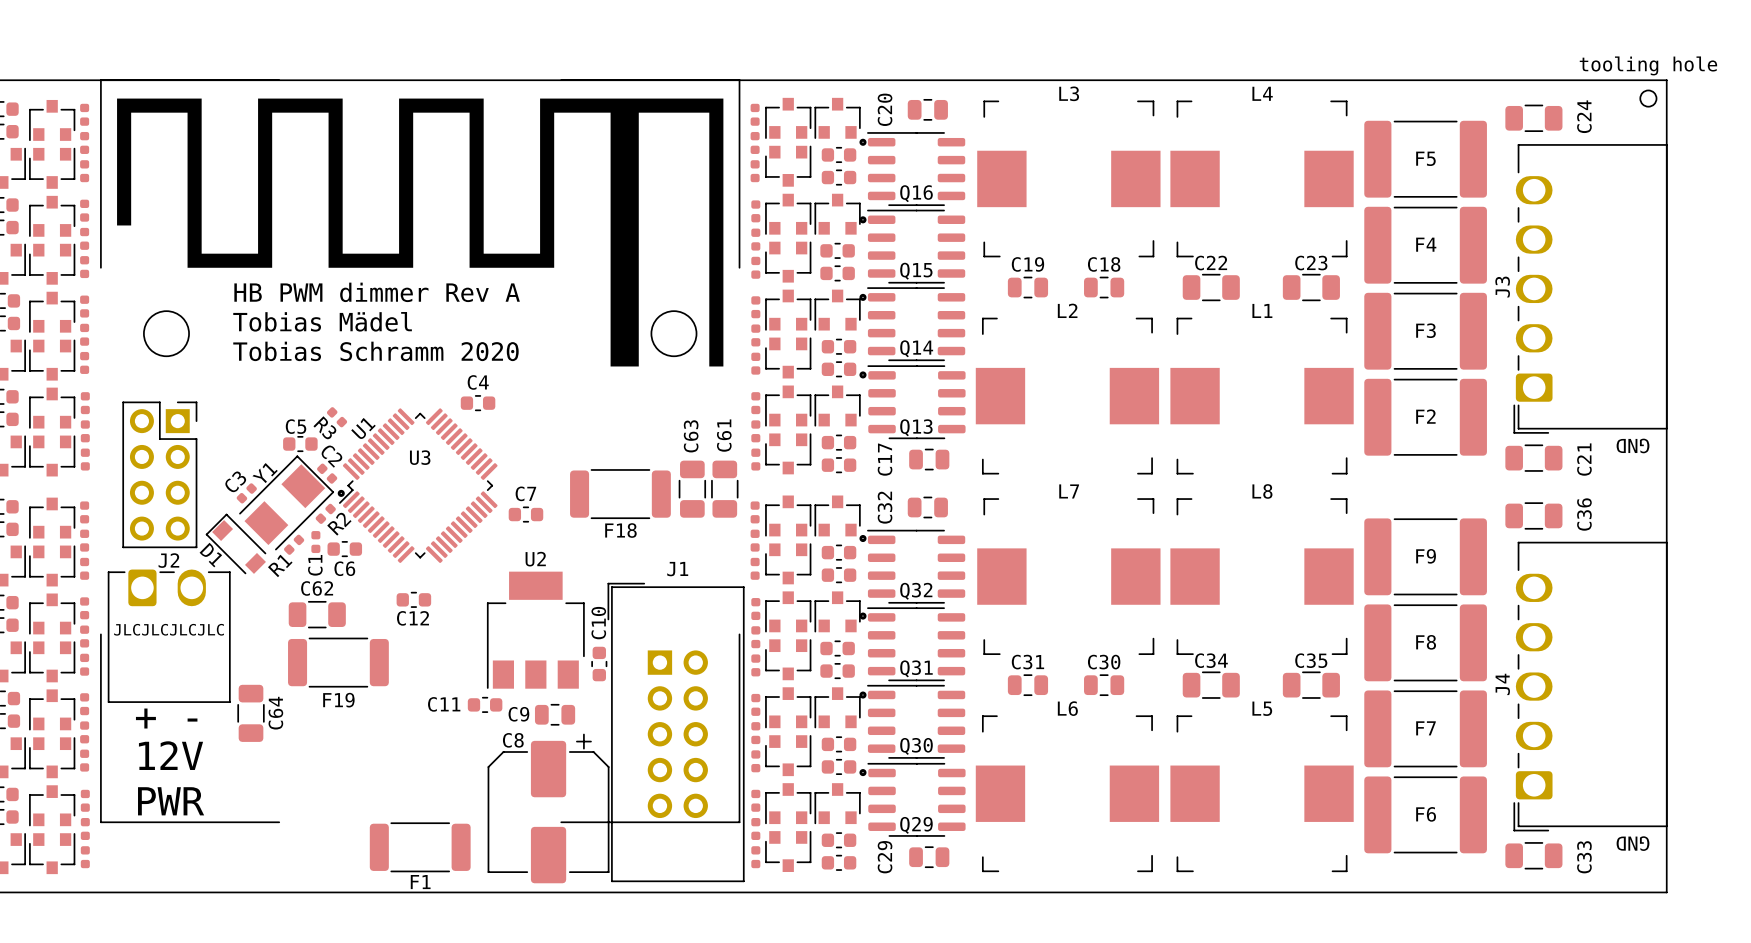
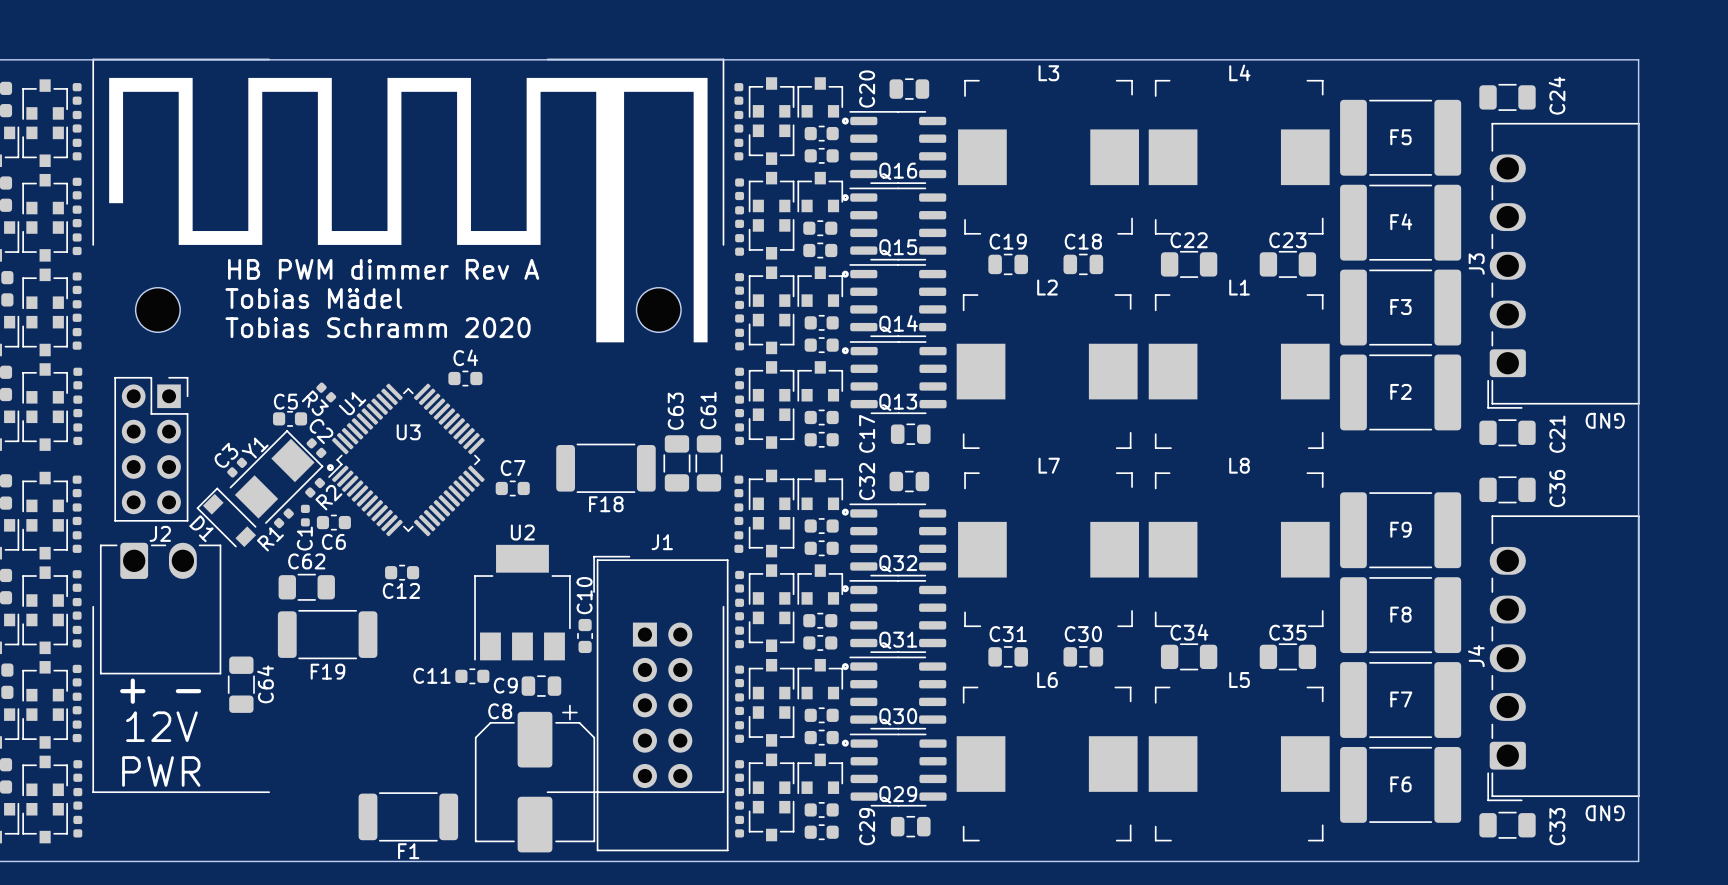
part: (1648, 98) -> none
text: JLCJLCJLCJLC (169, 629) -> none

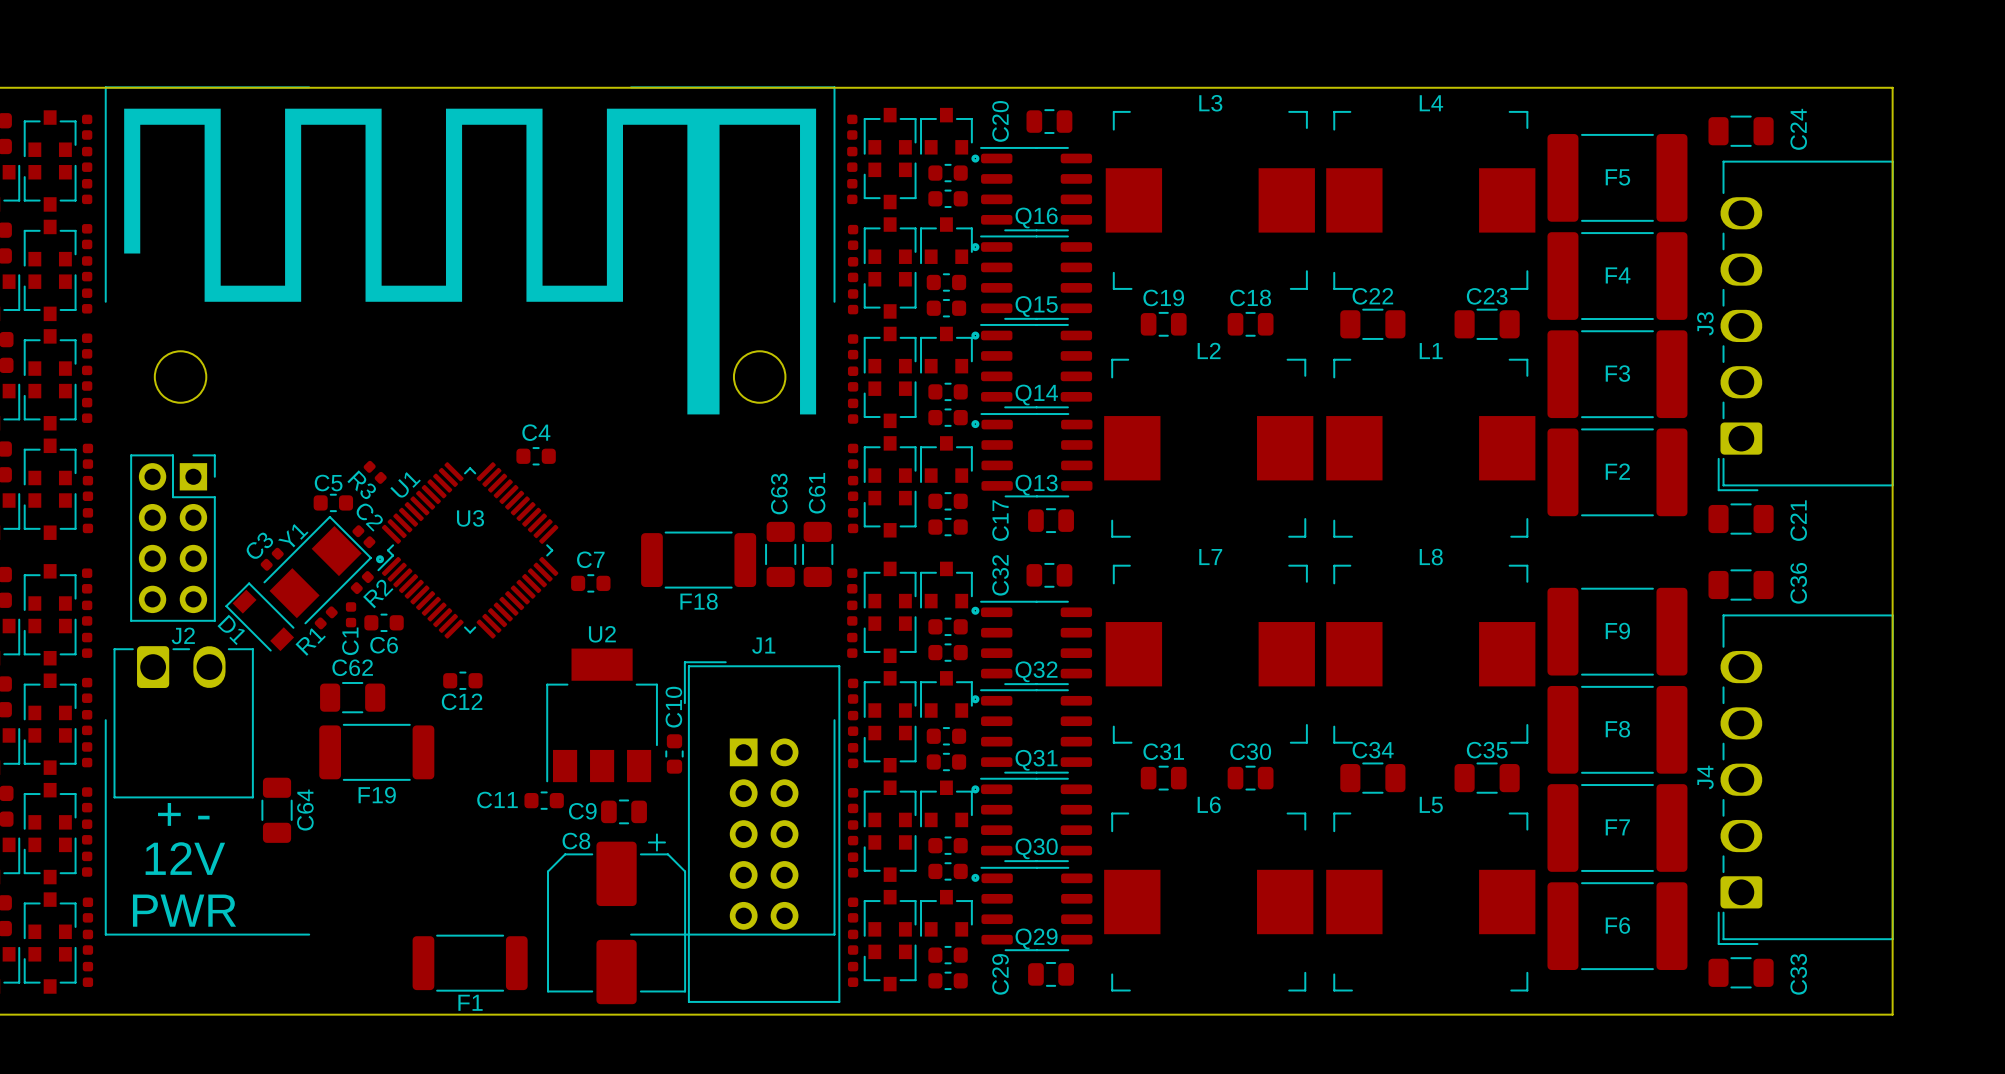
text: HB PWM dimmer Rev A (383, 269) -> none
text: Tobias Mädel (313, 298) -> none
text: Tobias Schramm 2020 (378, 327) -> none
text: GND (1605, 420) -> none
text: GND (1605, 813) -> none

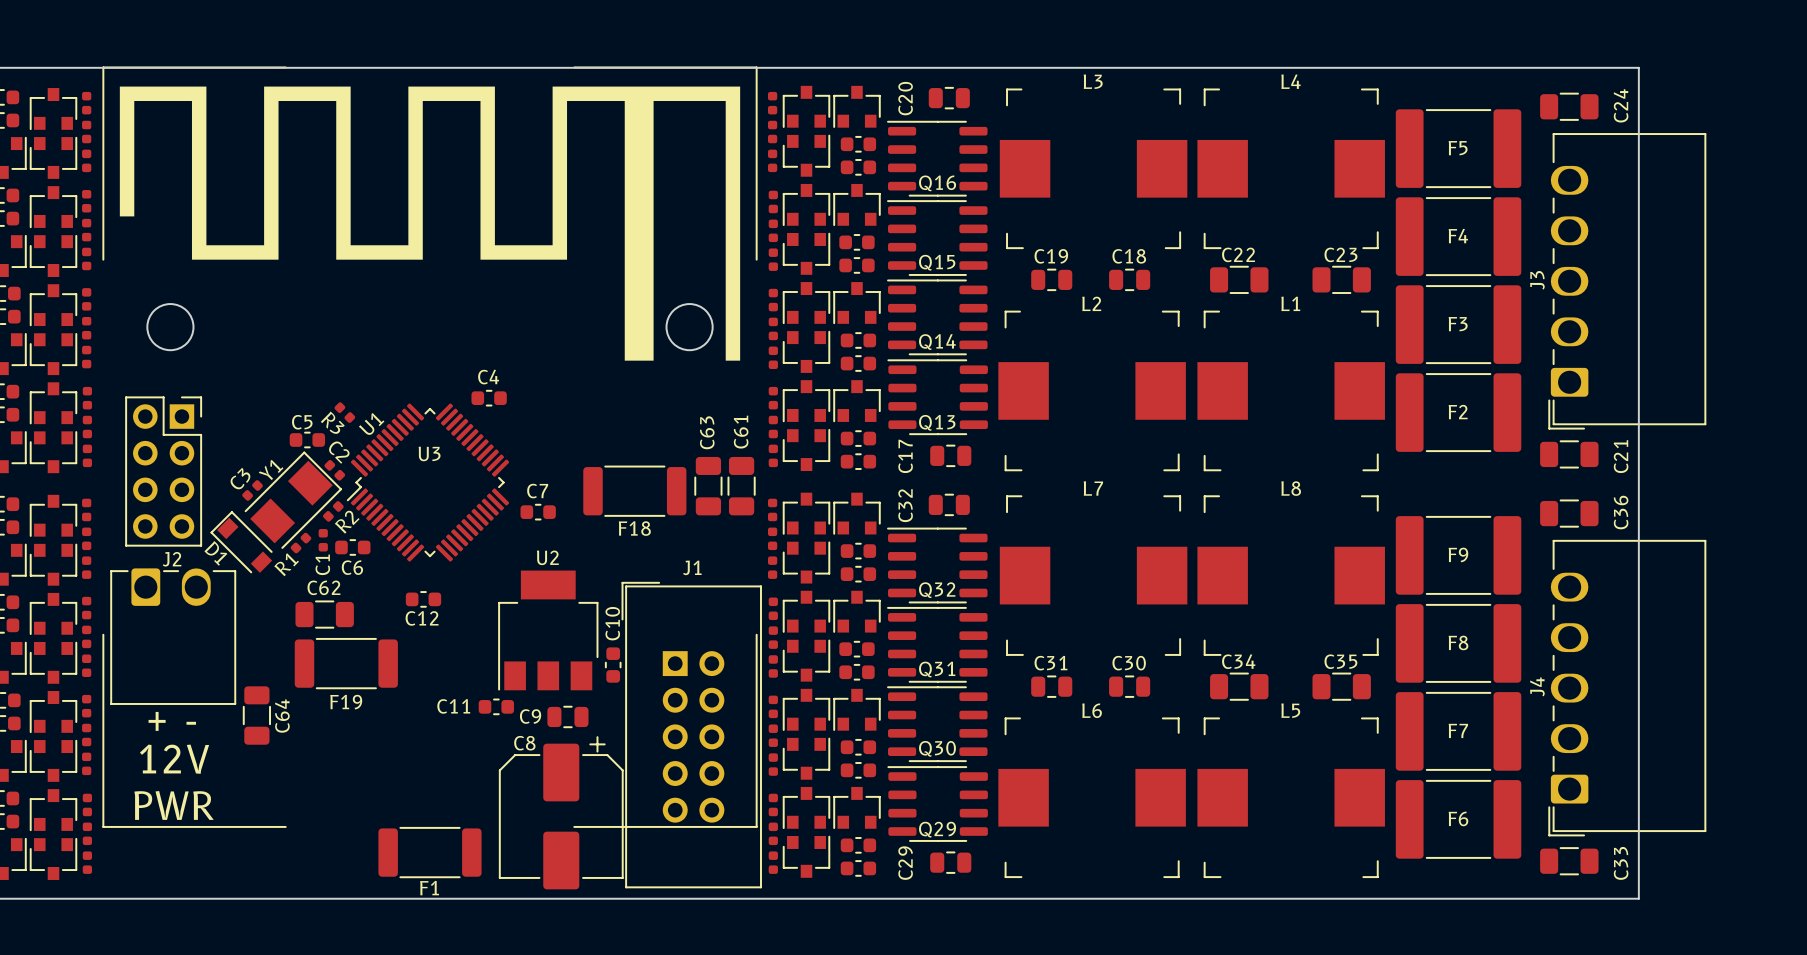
board edge: (1818, 87) (1892, 87) (1892, 1014) (1818, 1014) -> (1638, 67) (1638, 898)
drawing: [971, 154, 980, 163] -> none
drawing: [971, 243, 980, 252] -> none
drawing: [971, 331, 980, 340] -> none
drawing: [971, 420, 980, 429] -> none
drawing: [375, 555, 385, 564] -> none
drawing: [971, 606, 980, 615] -> none
drawing: [971, 695, 980, 704] -> none
drawing: [971, 785, 980, 794] -> none
drawing: [971, 873, 980, 882] -> none

